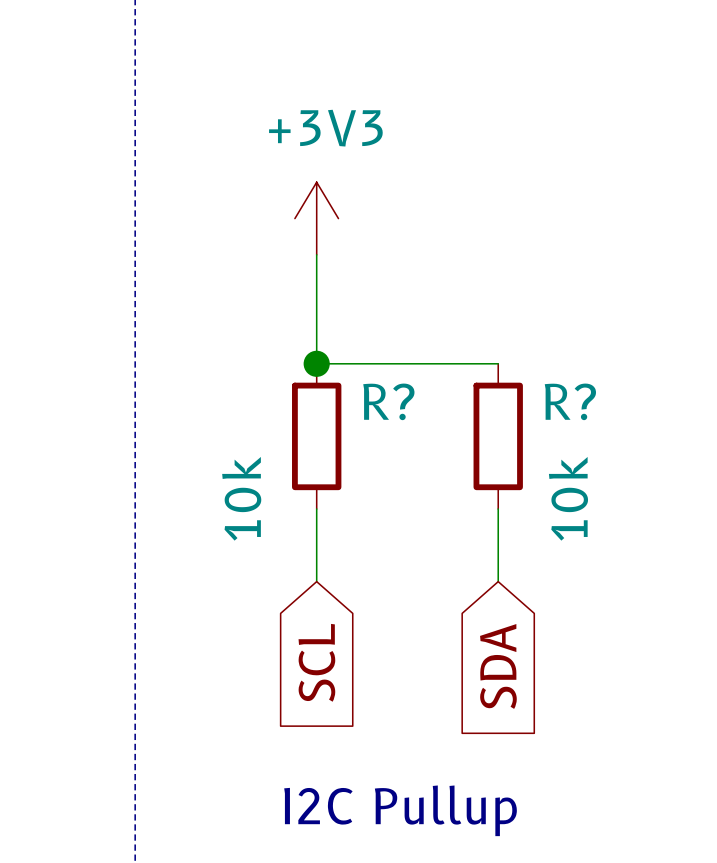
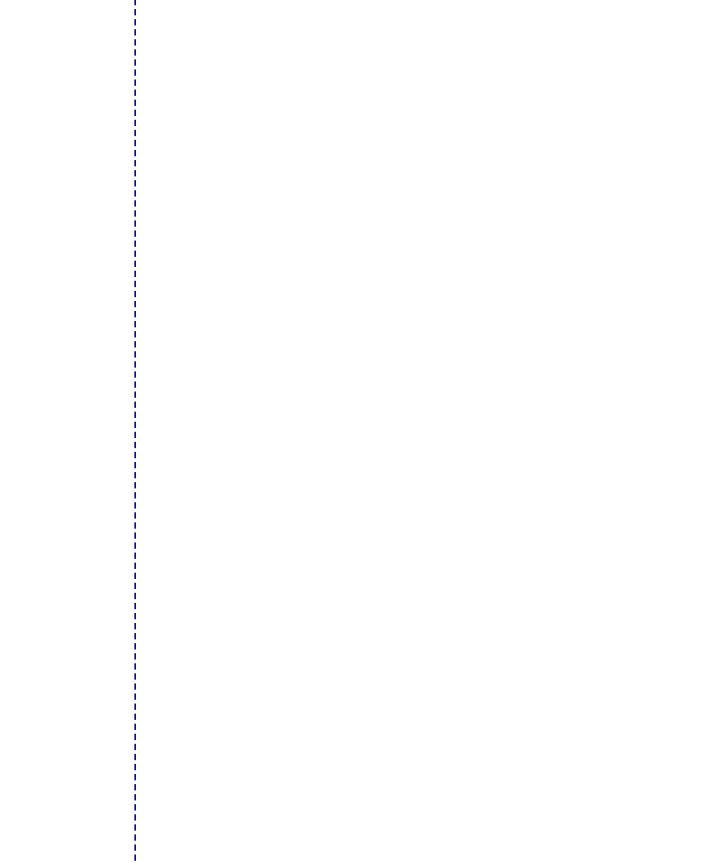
power symbol: +3V3 (316, 218) -> none
wire: (316, 254) (316, 363) (498, 363) -> none
junction: (316, 363) -> none
R?: 10k (316, 436) -> none
R?: 10k (498, 436) -> none
wire: (316, 509) (316, 581) -> none
wire: (498, 509) (498, 581) -> none
global label: SCL (316, 662) -> none
global label: SDA (498, 666) -> none
text: I2C Pullup (400, 810) -> none

